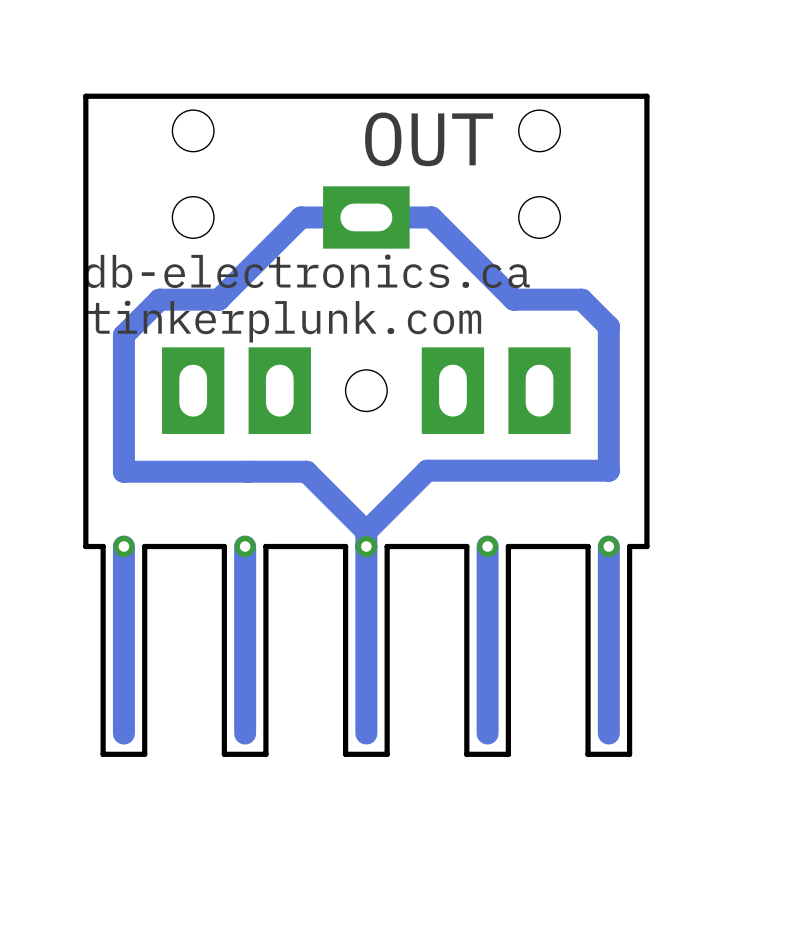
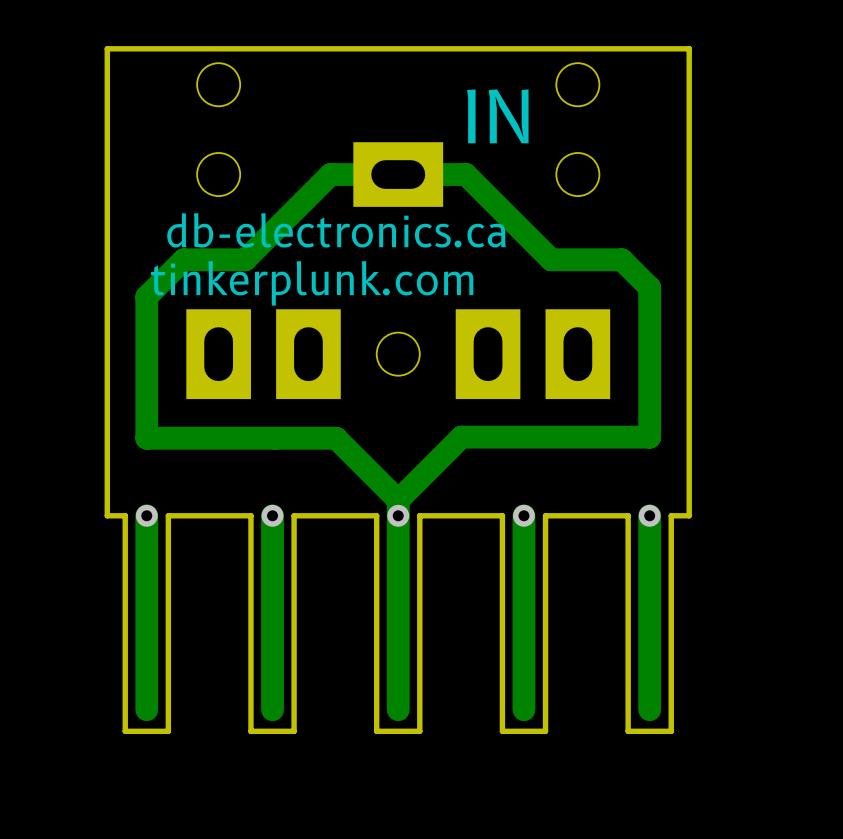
text: OUT (429, 139) -> none
text: none -> IN (497, 116)

